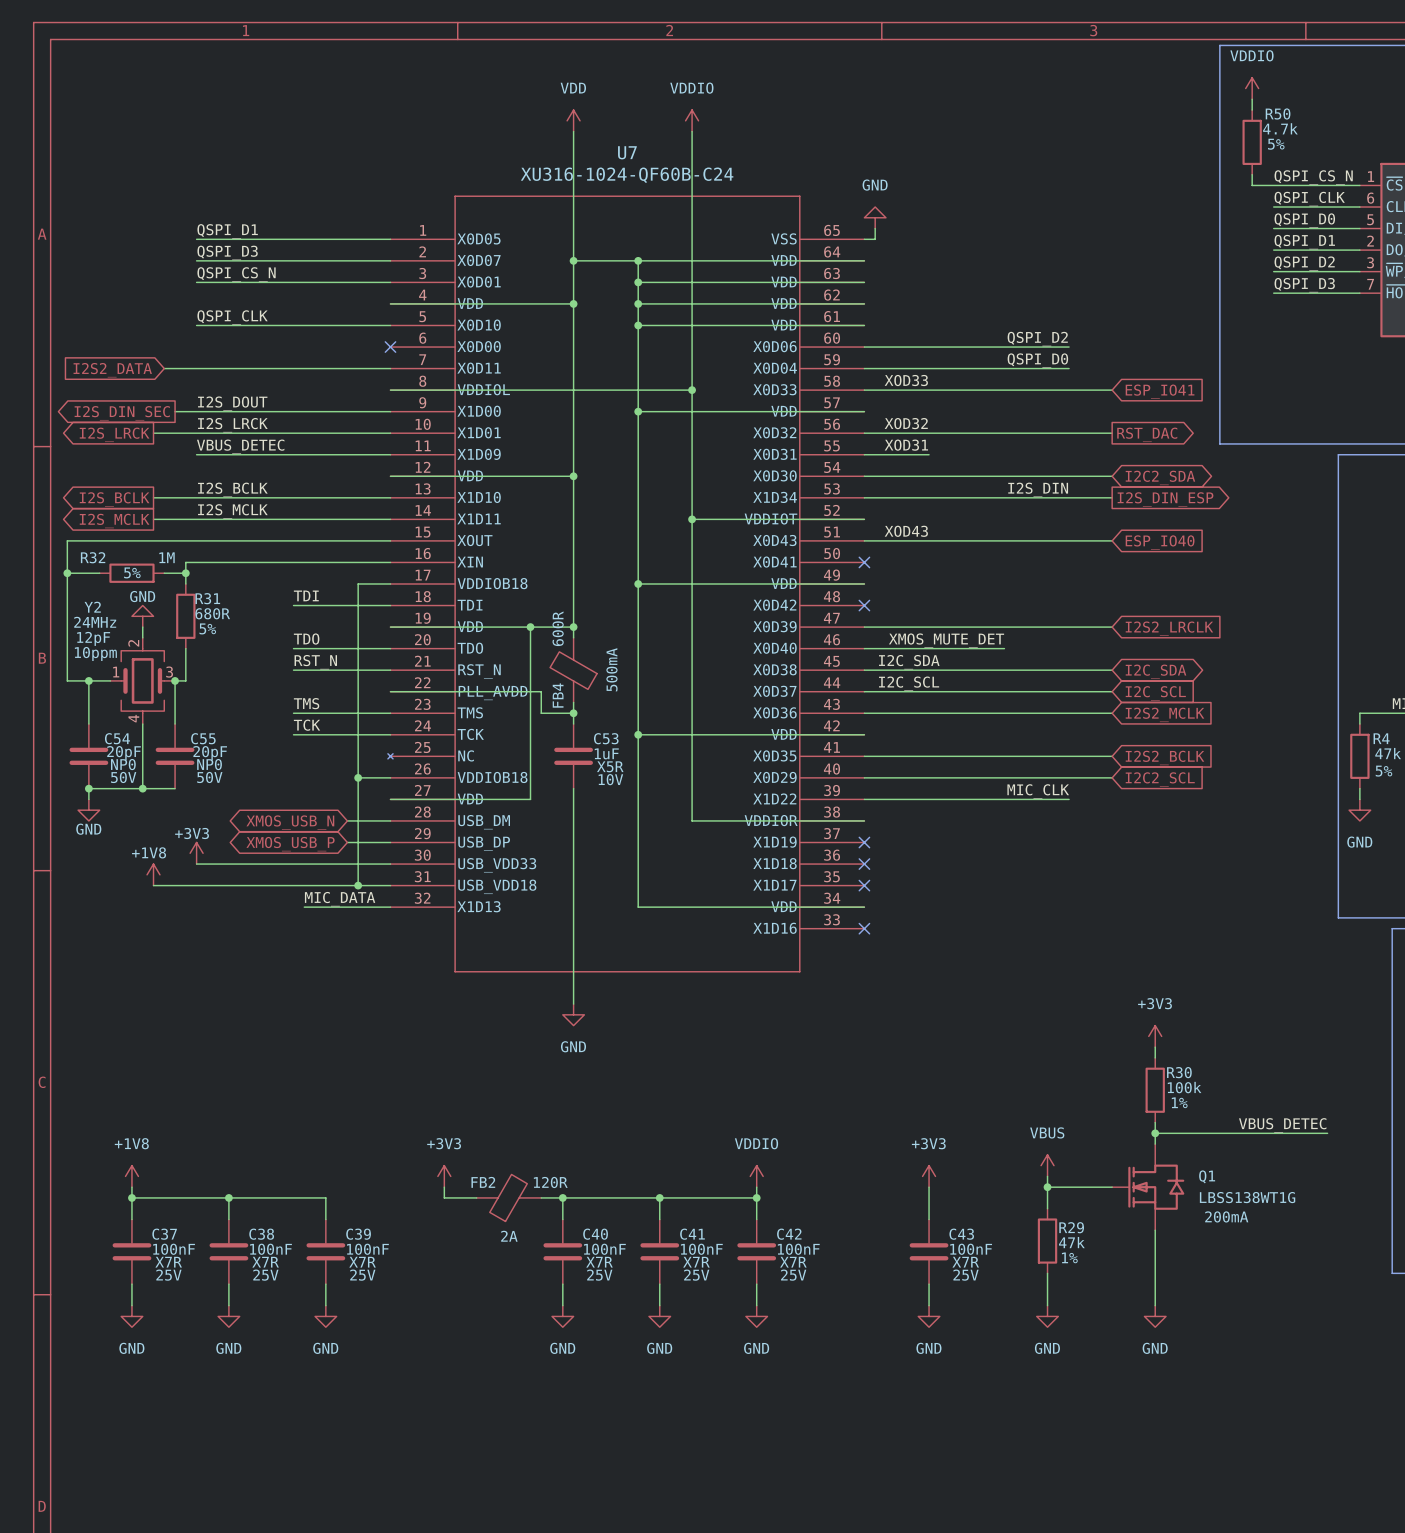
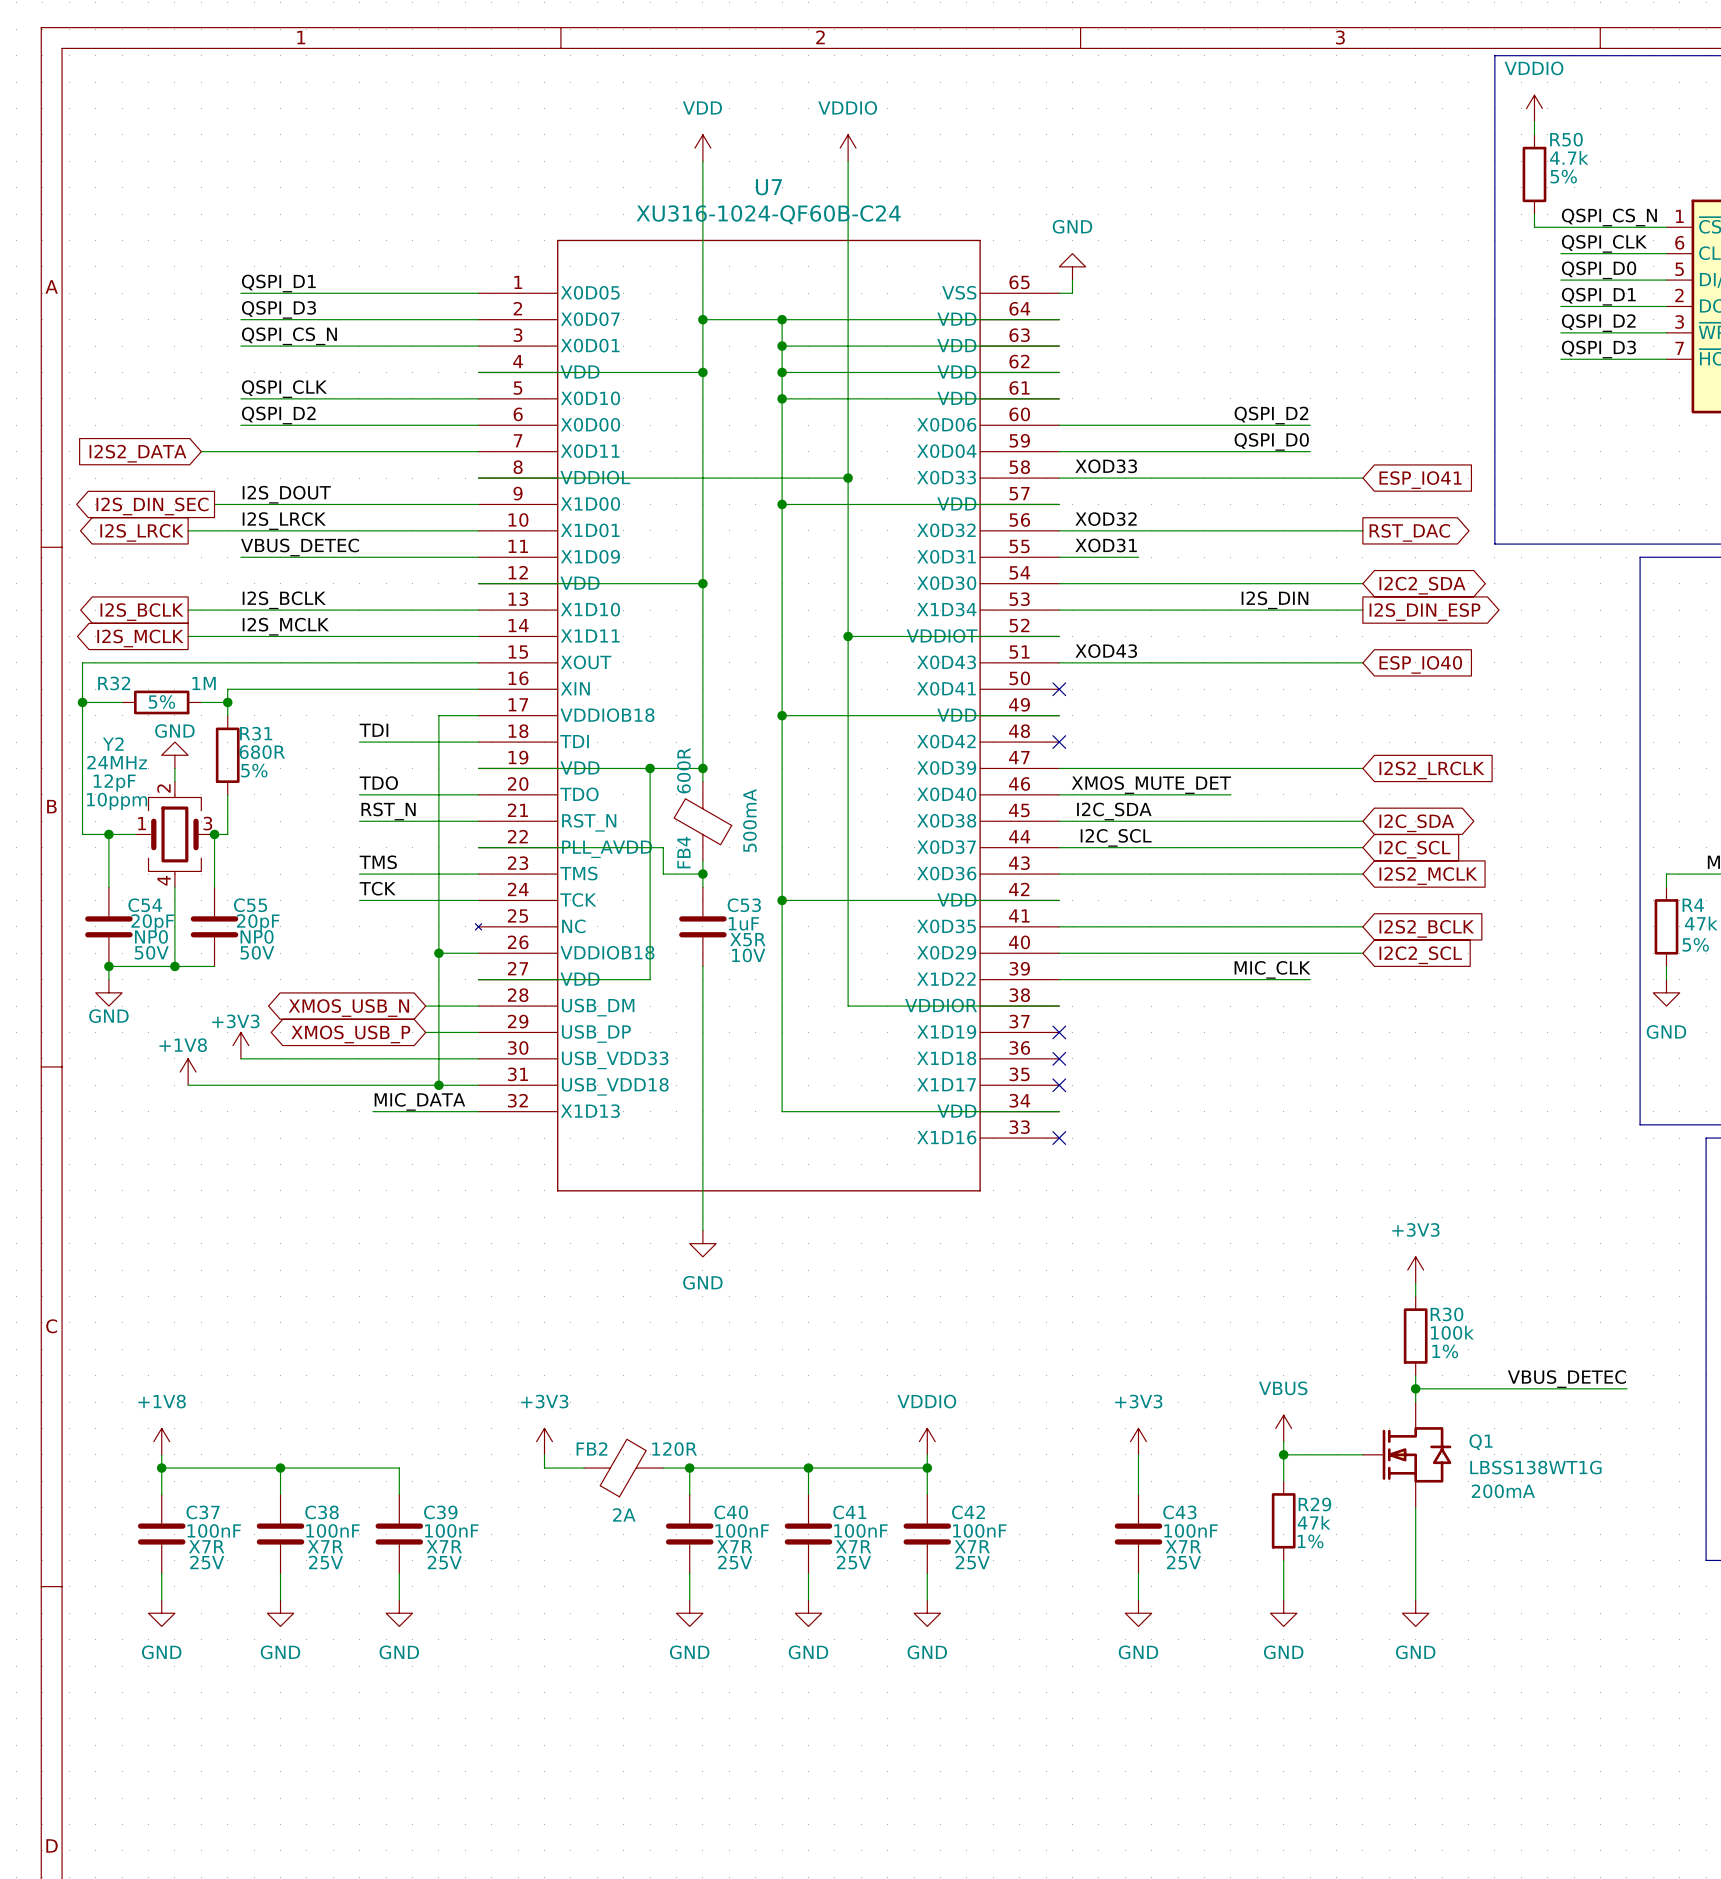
label: none -> QSPI_D2 (278, 415)
wire: none -> (240, 425) (478, 425)
no-connect mark: (390, 347) -> none

